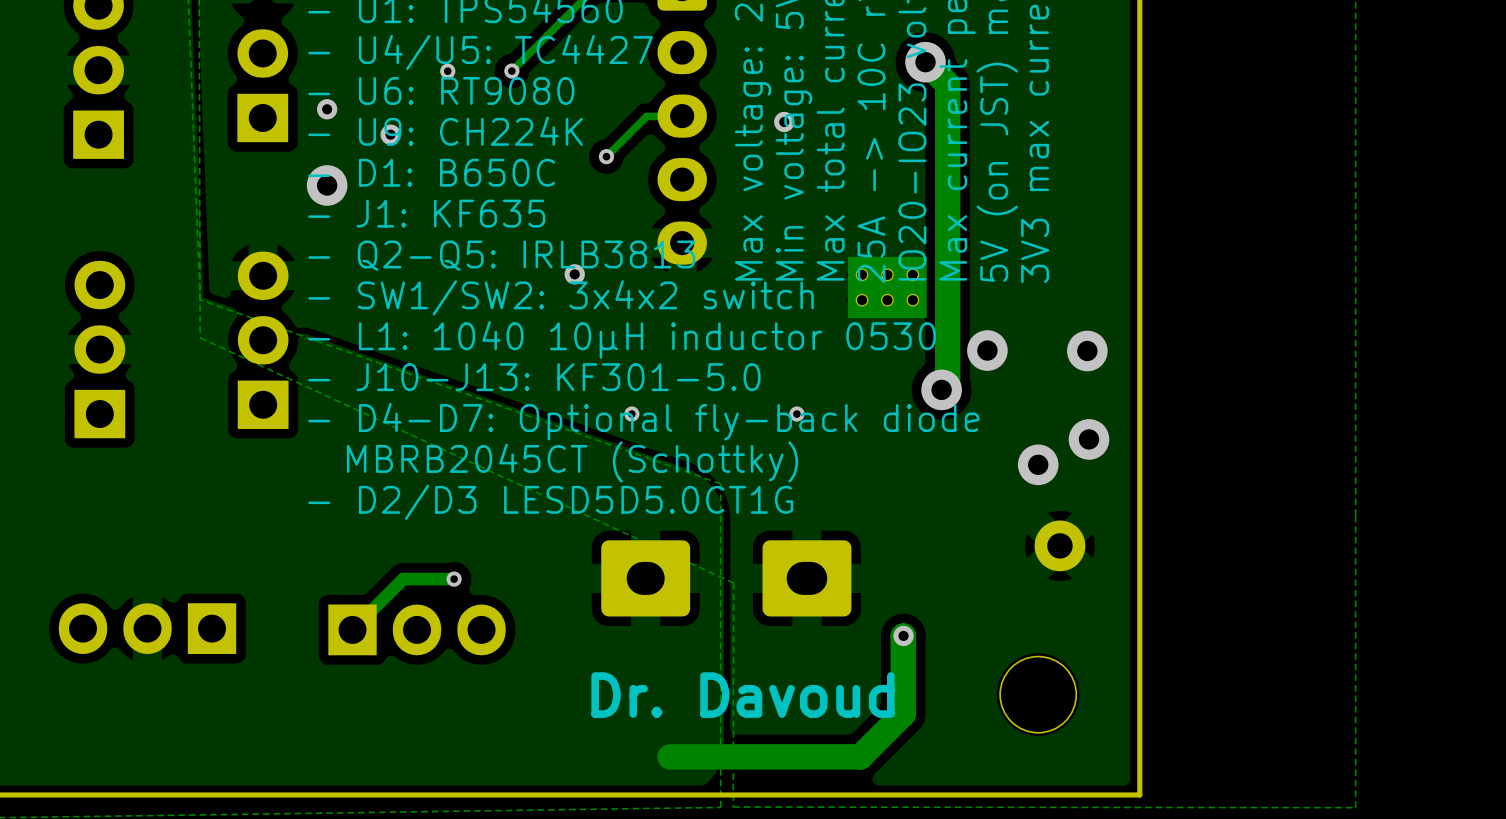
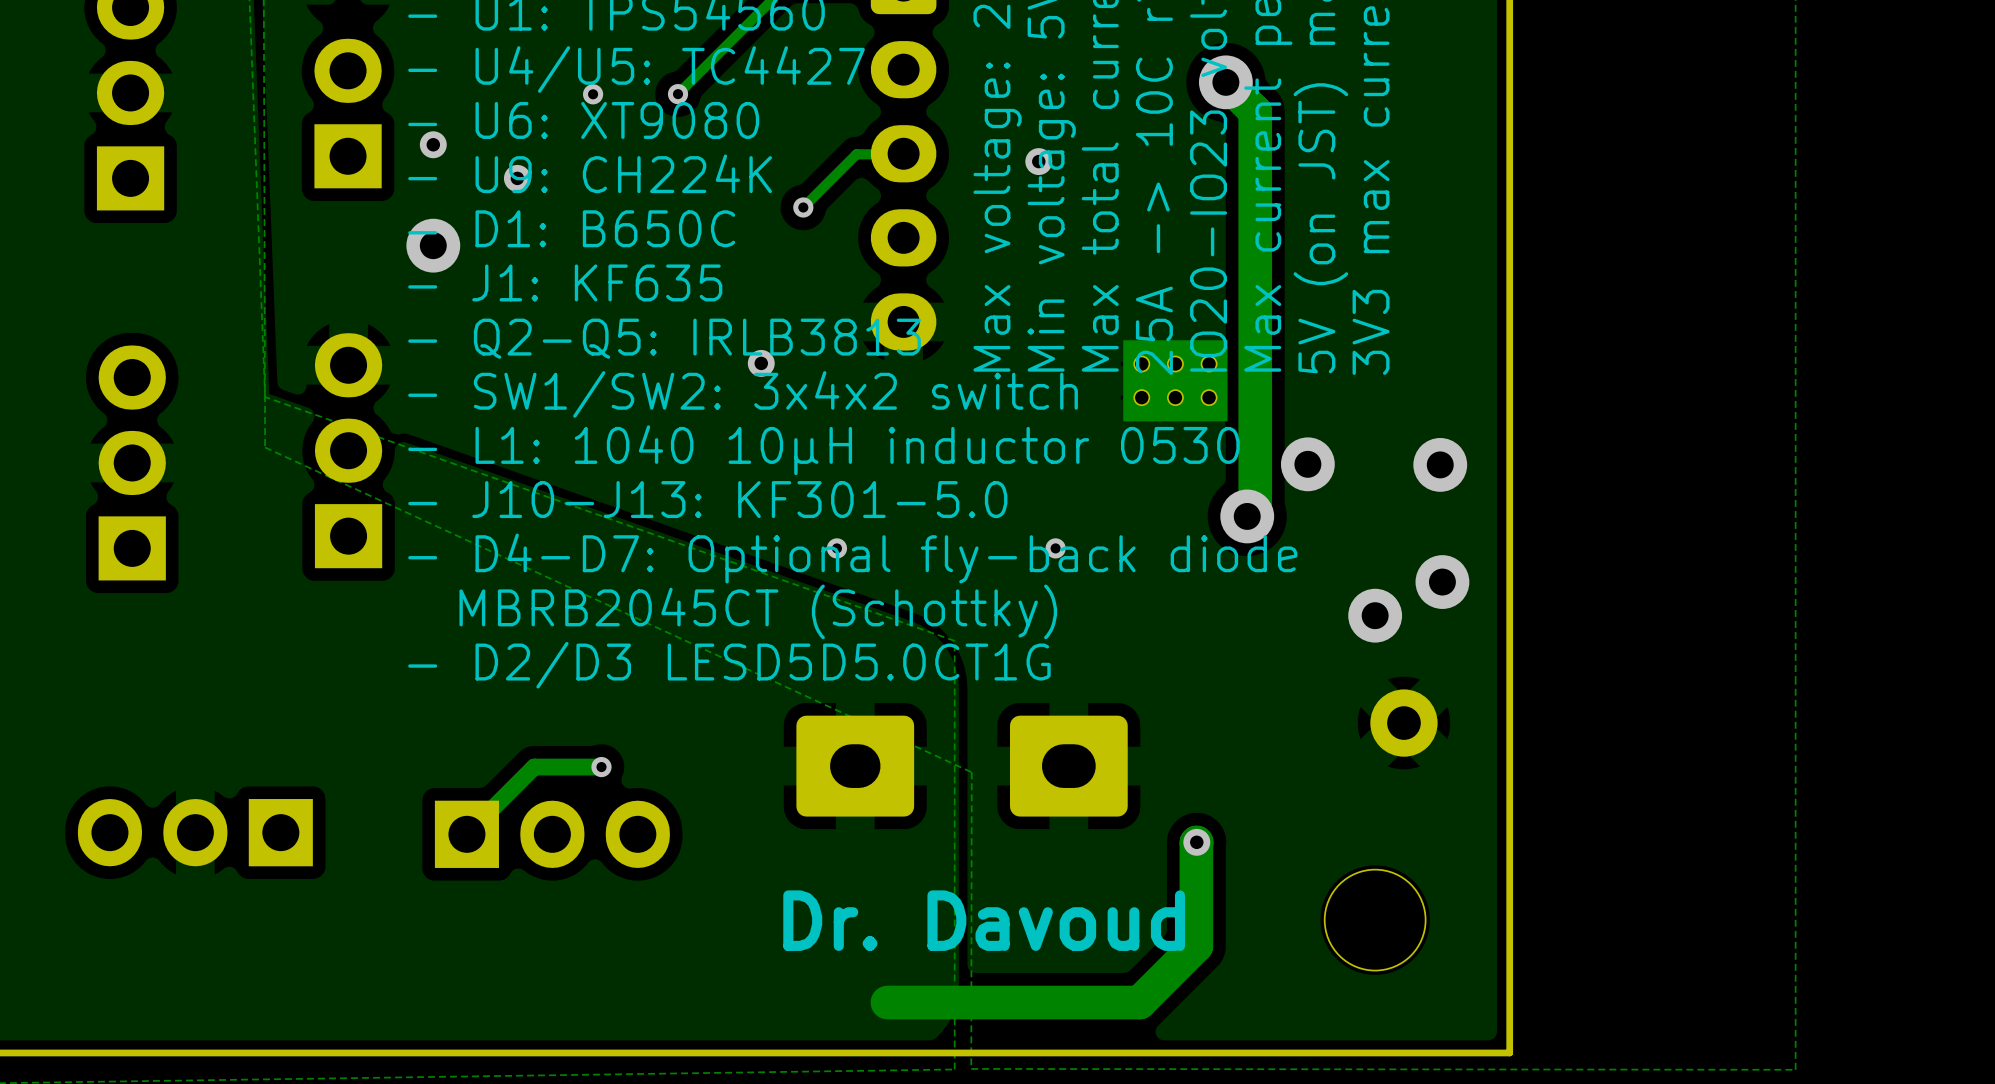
text: - U6: RT9080 (441, 90) -> - U6: XT9080 (583, 120)

